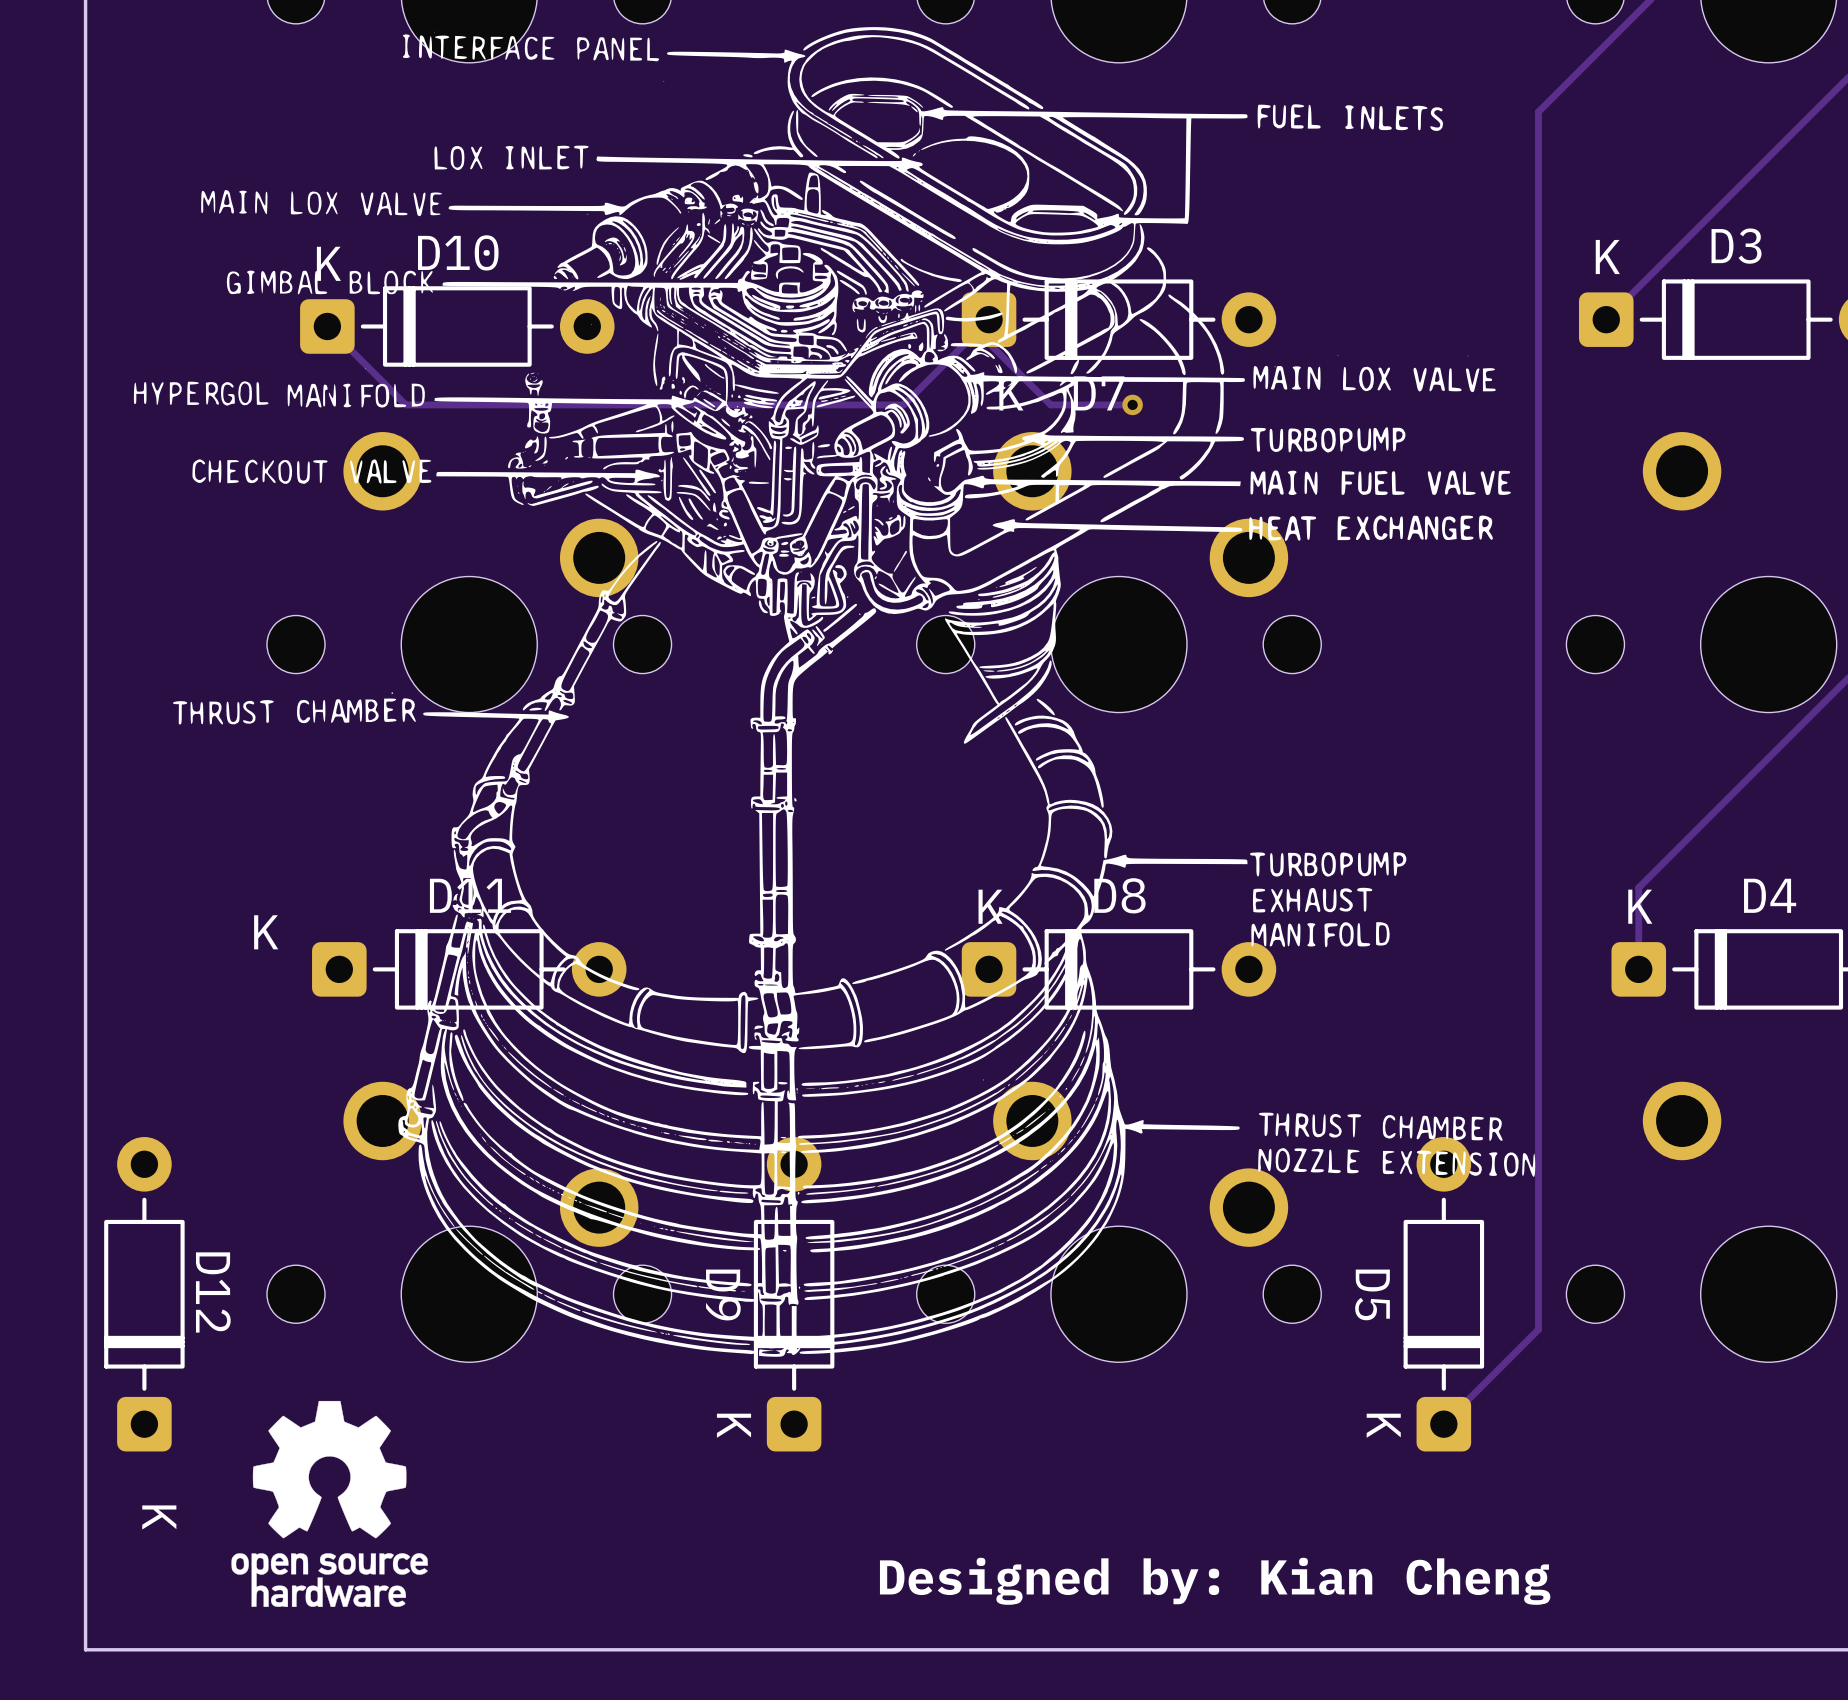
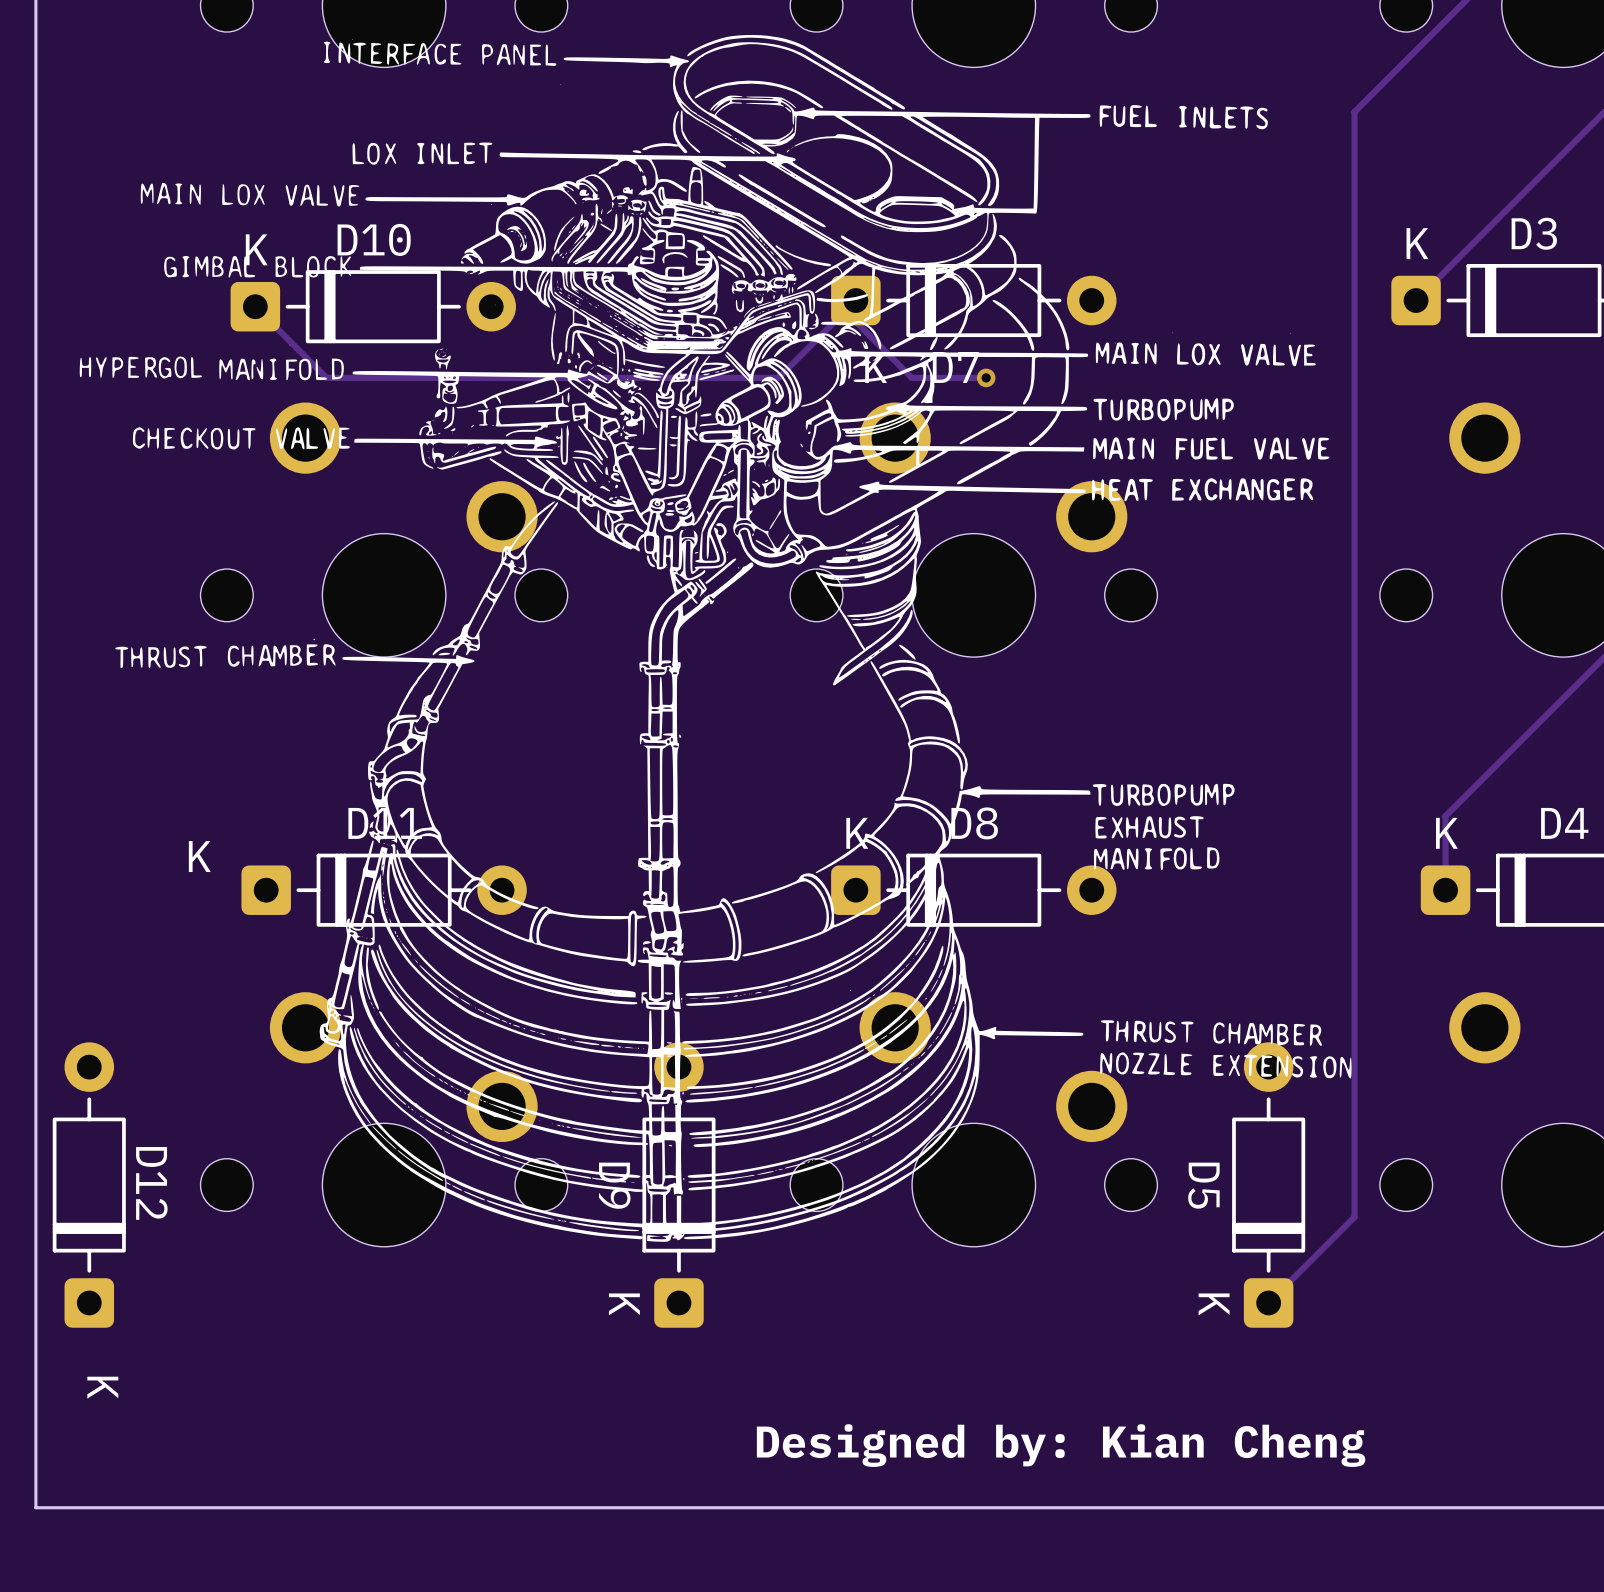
drawing: [231, 1400, 428, 1607] -> none

